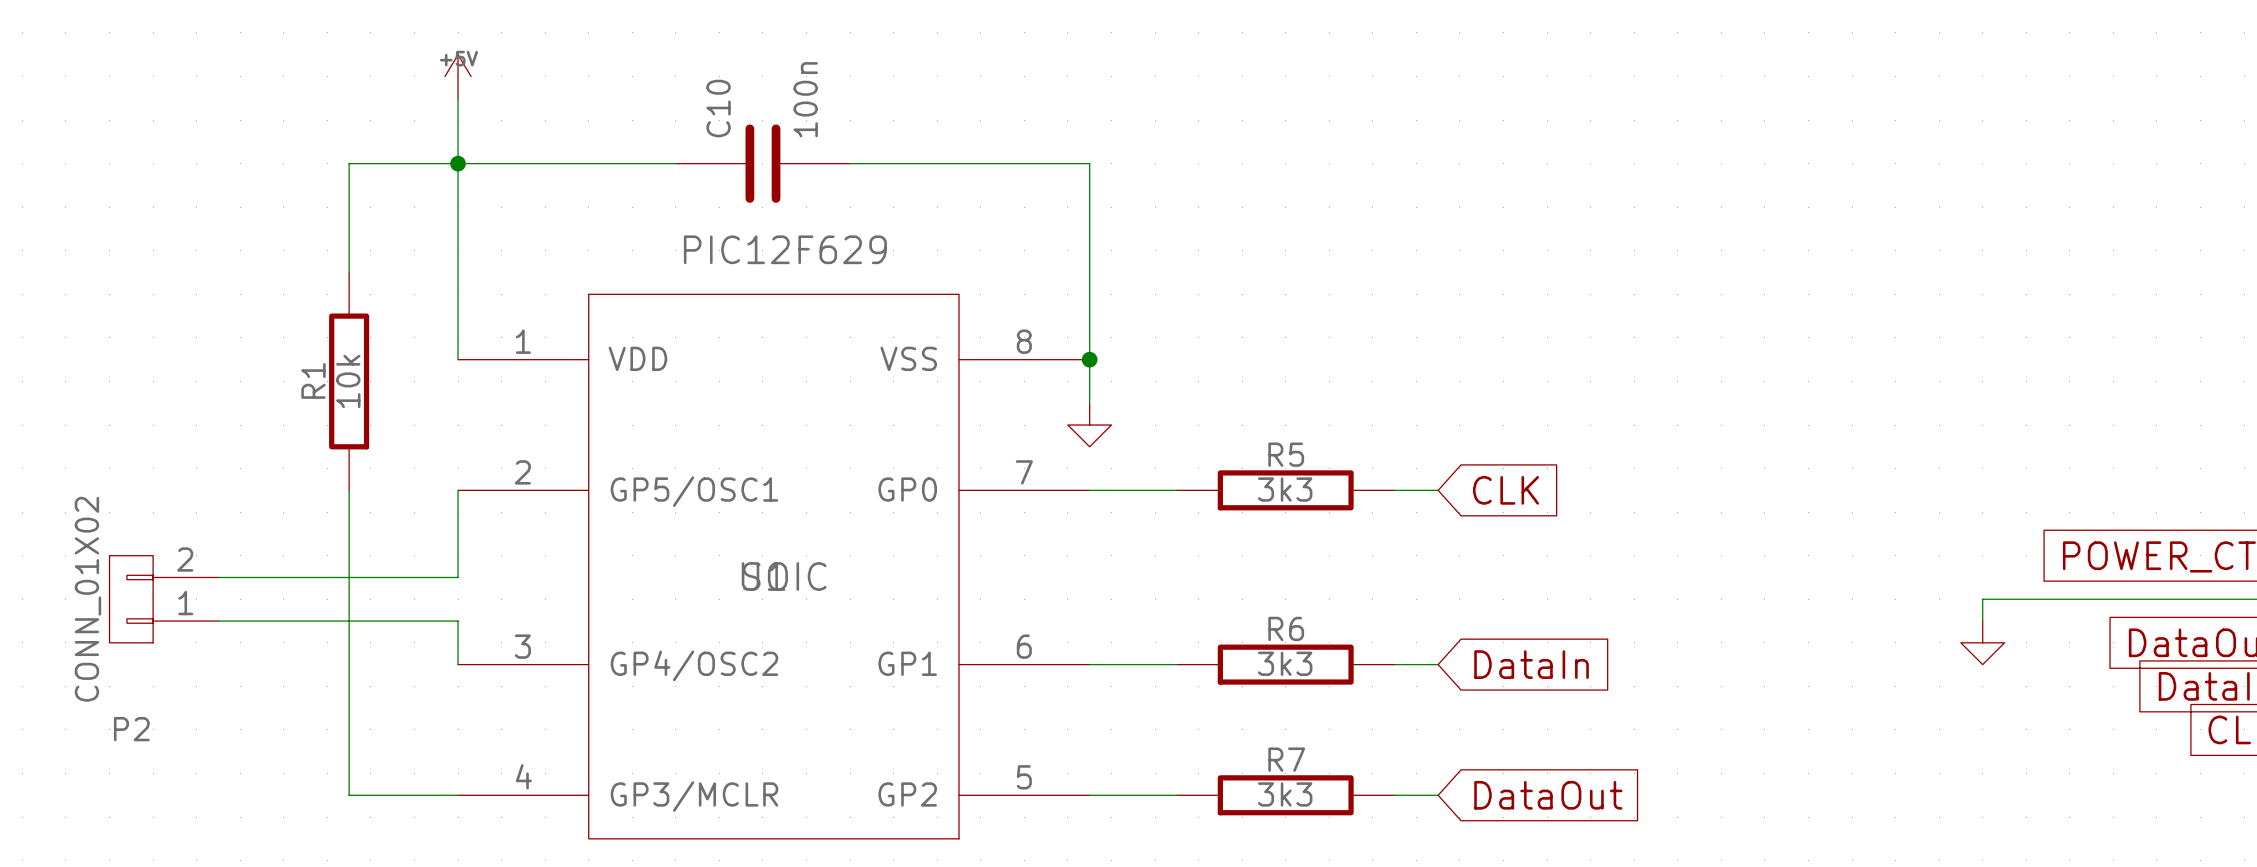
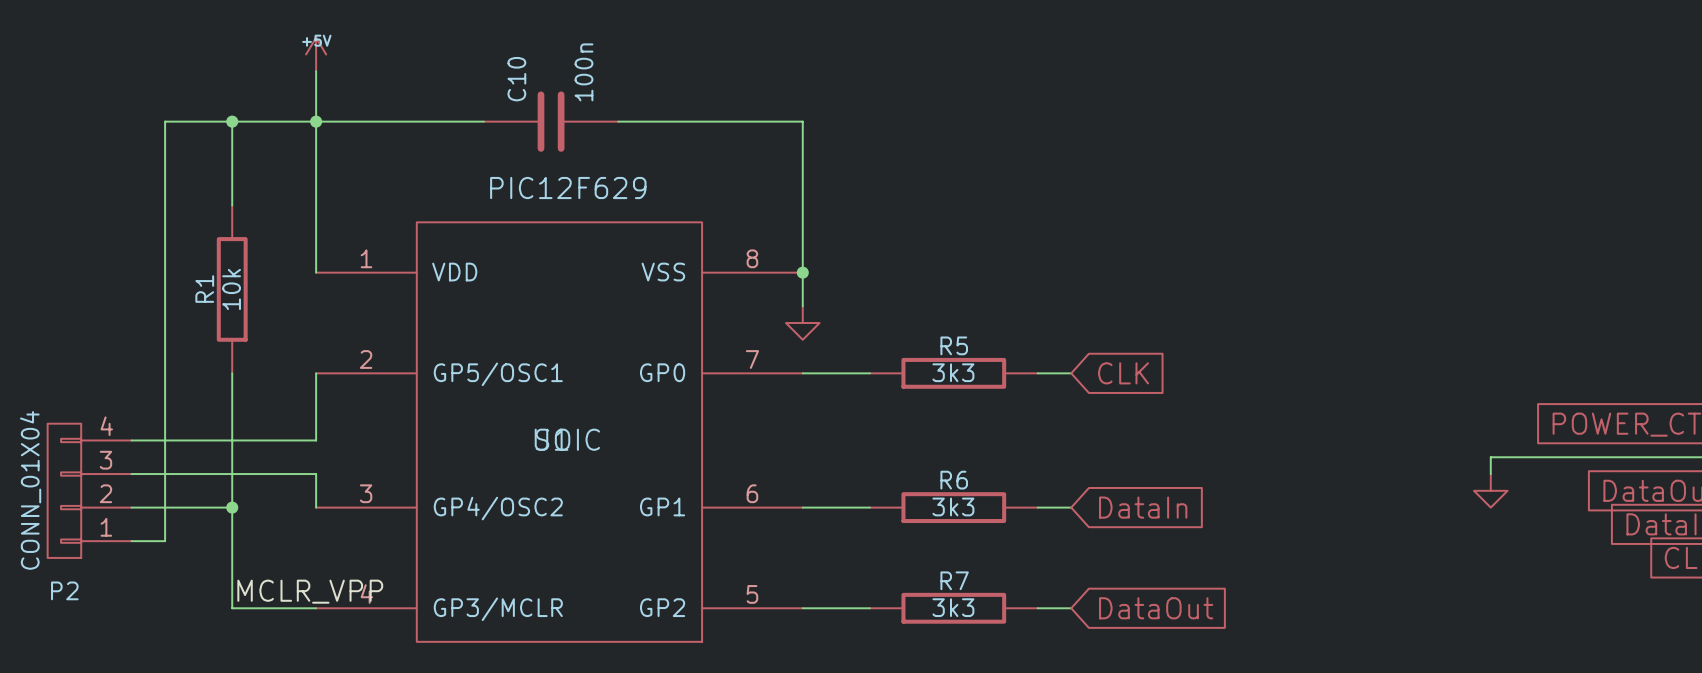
wire: none -> (232, 121) (165, 121) (165, 541) (131, 541)
junction: none -> (232, 121)
P2 symbol: [109, 555, 219, 643] -> [47, 423, 132, 558]
P2 value: CONN_01X02 (87, 599) -> CONN_01X04 (30, 490)
wire: none -> (131, 507) (232, 507)
junction: none -> (232, 507)
label: none -> MCLR_VPP (310, 591)

